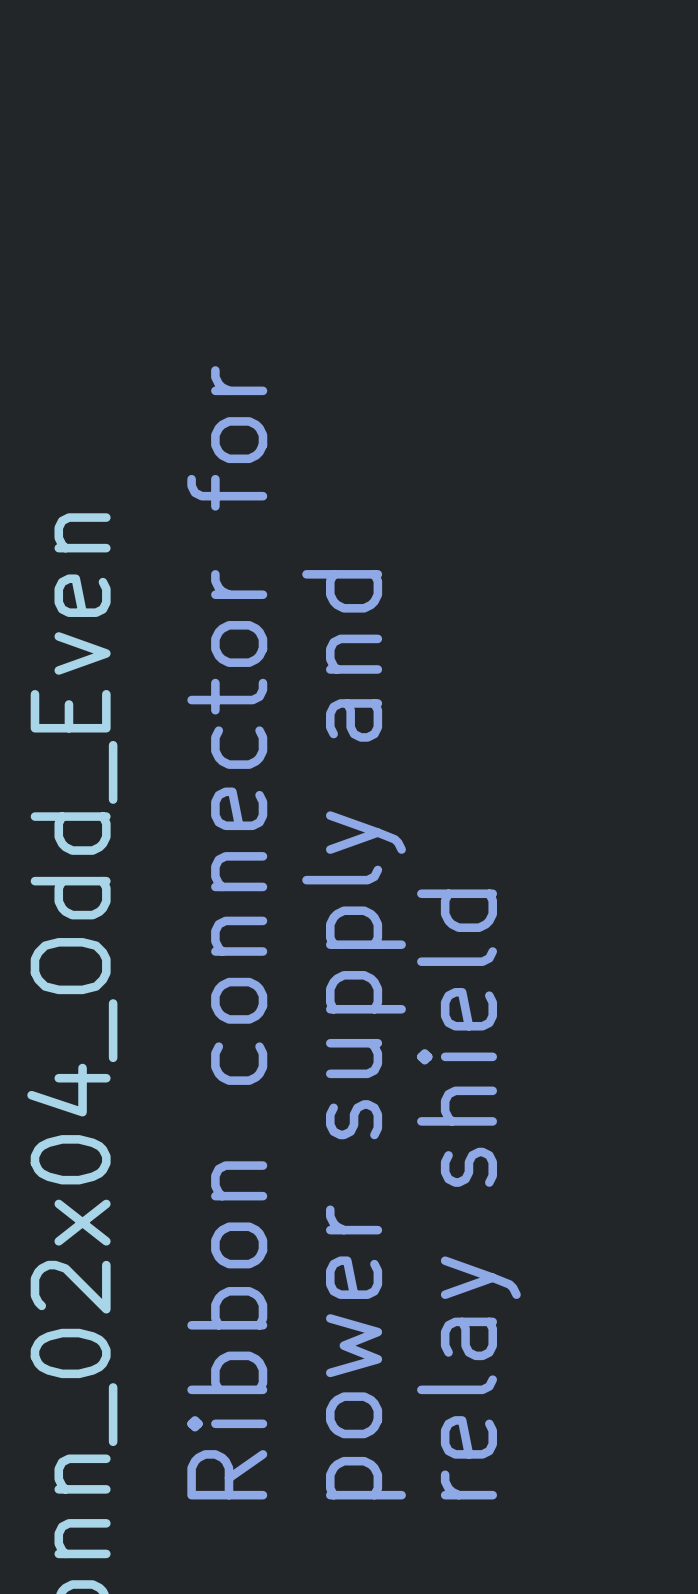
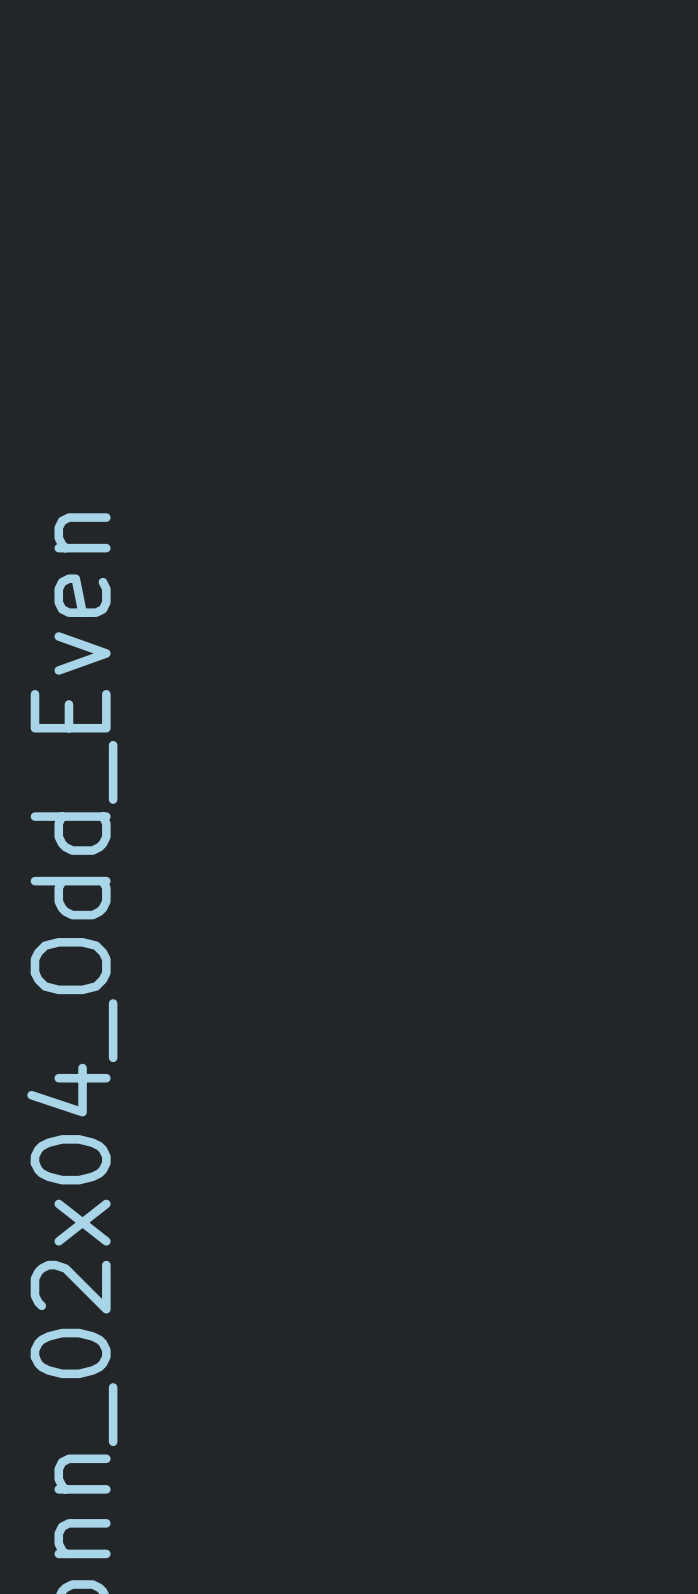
text: Ribbon connector for (227, 932) -> none
text: power supply and (354, 1034) -> none
text: relay shield (468, 1194) -> none

